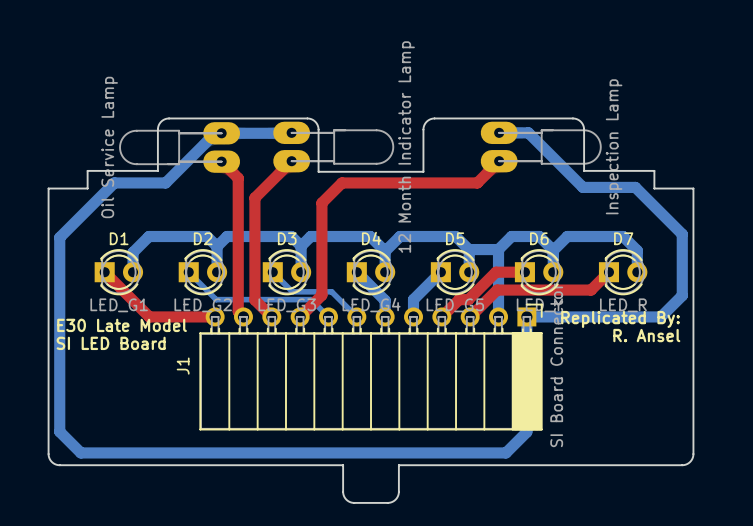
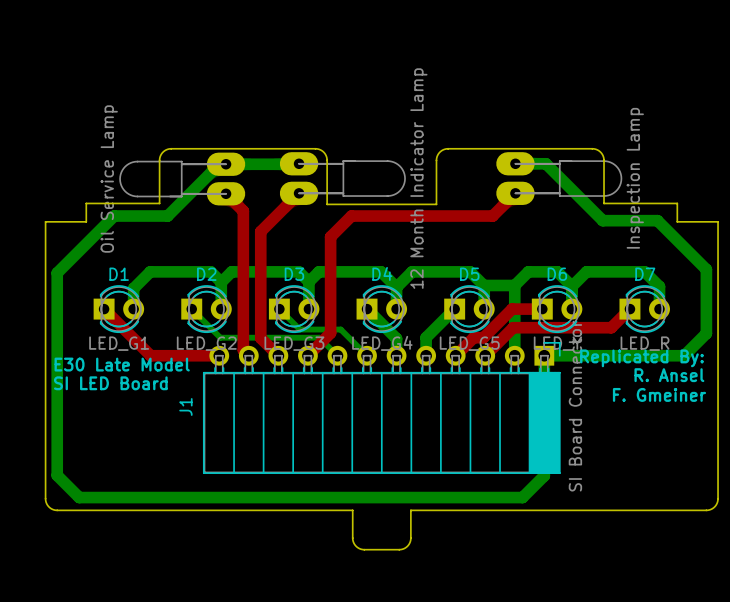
text: none -> F. Gmeiner (659, 394)

